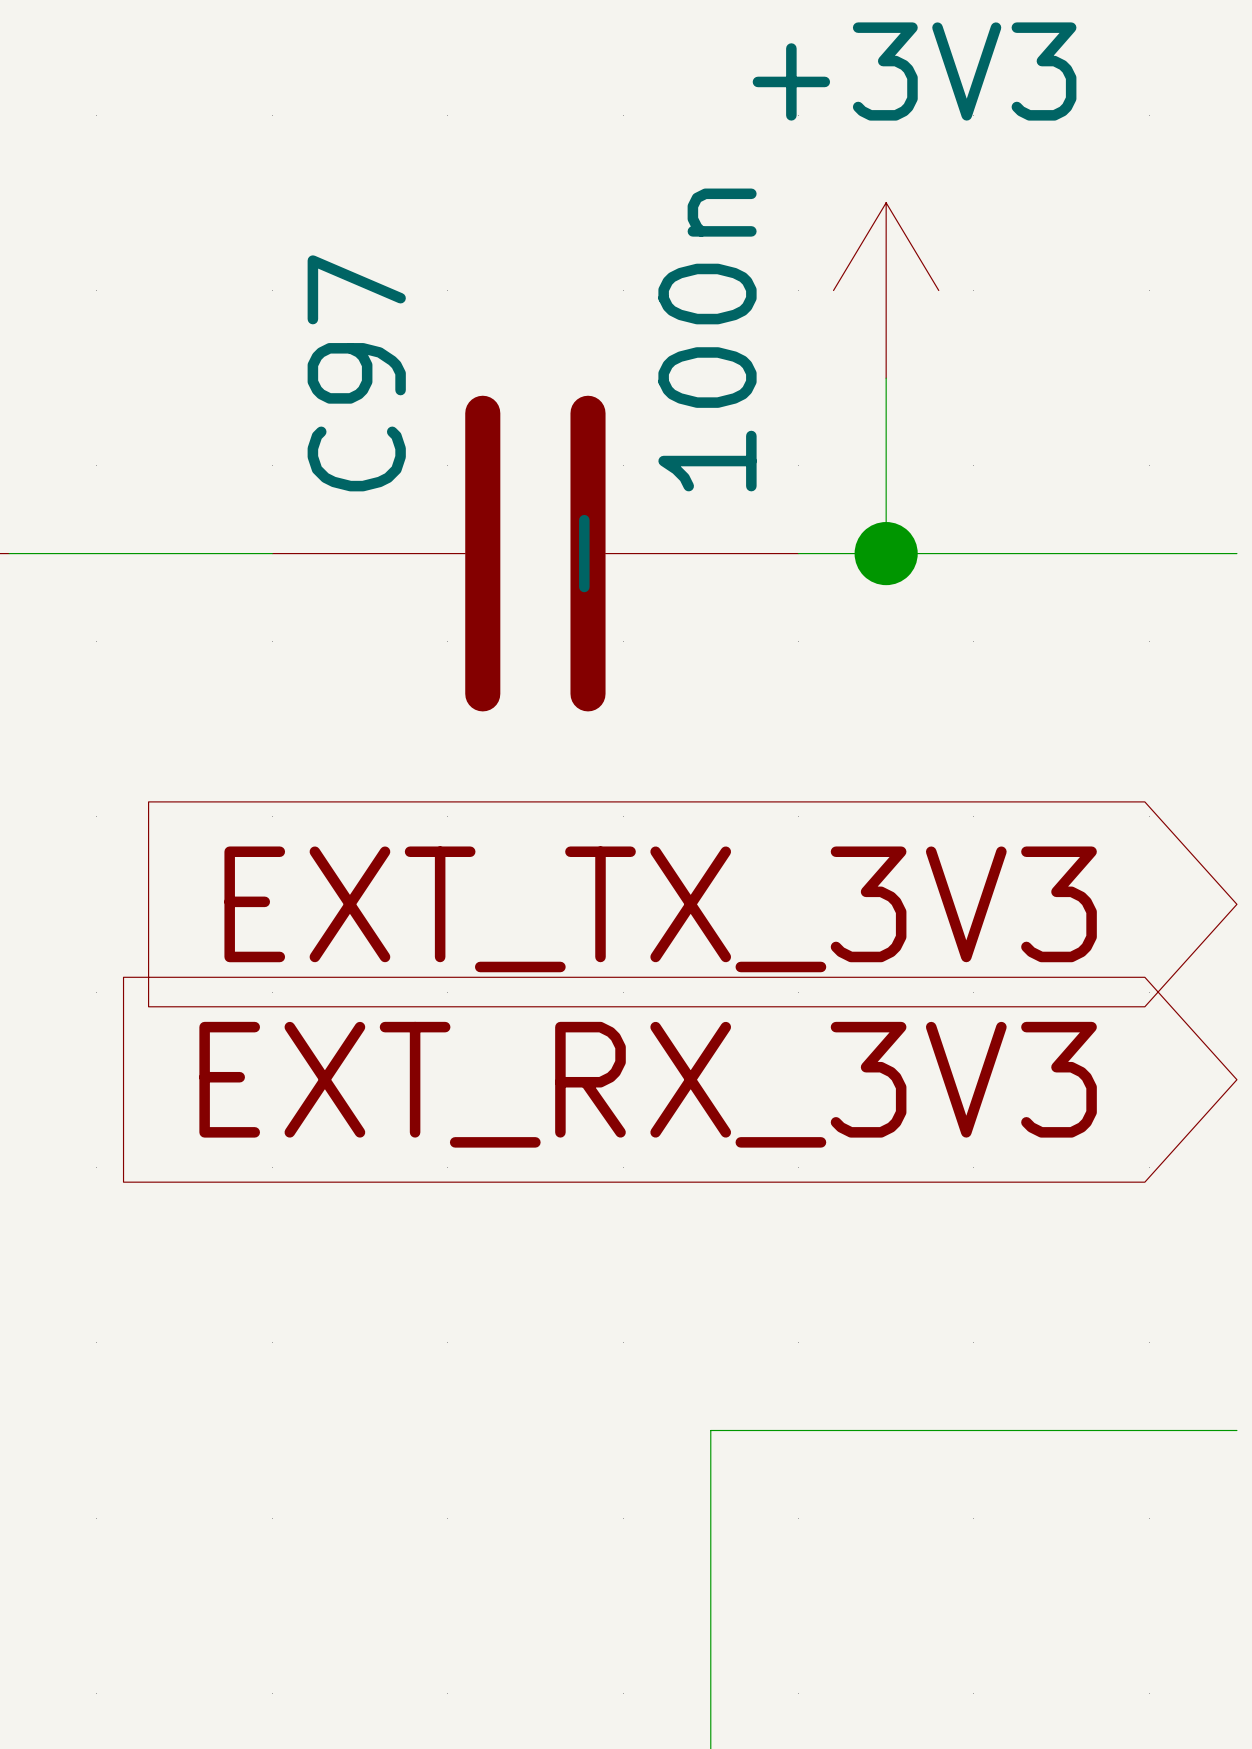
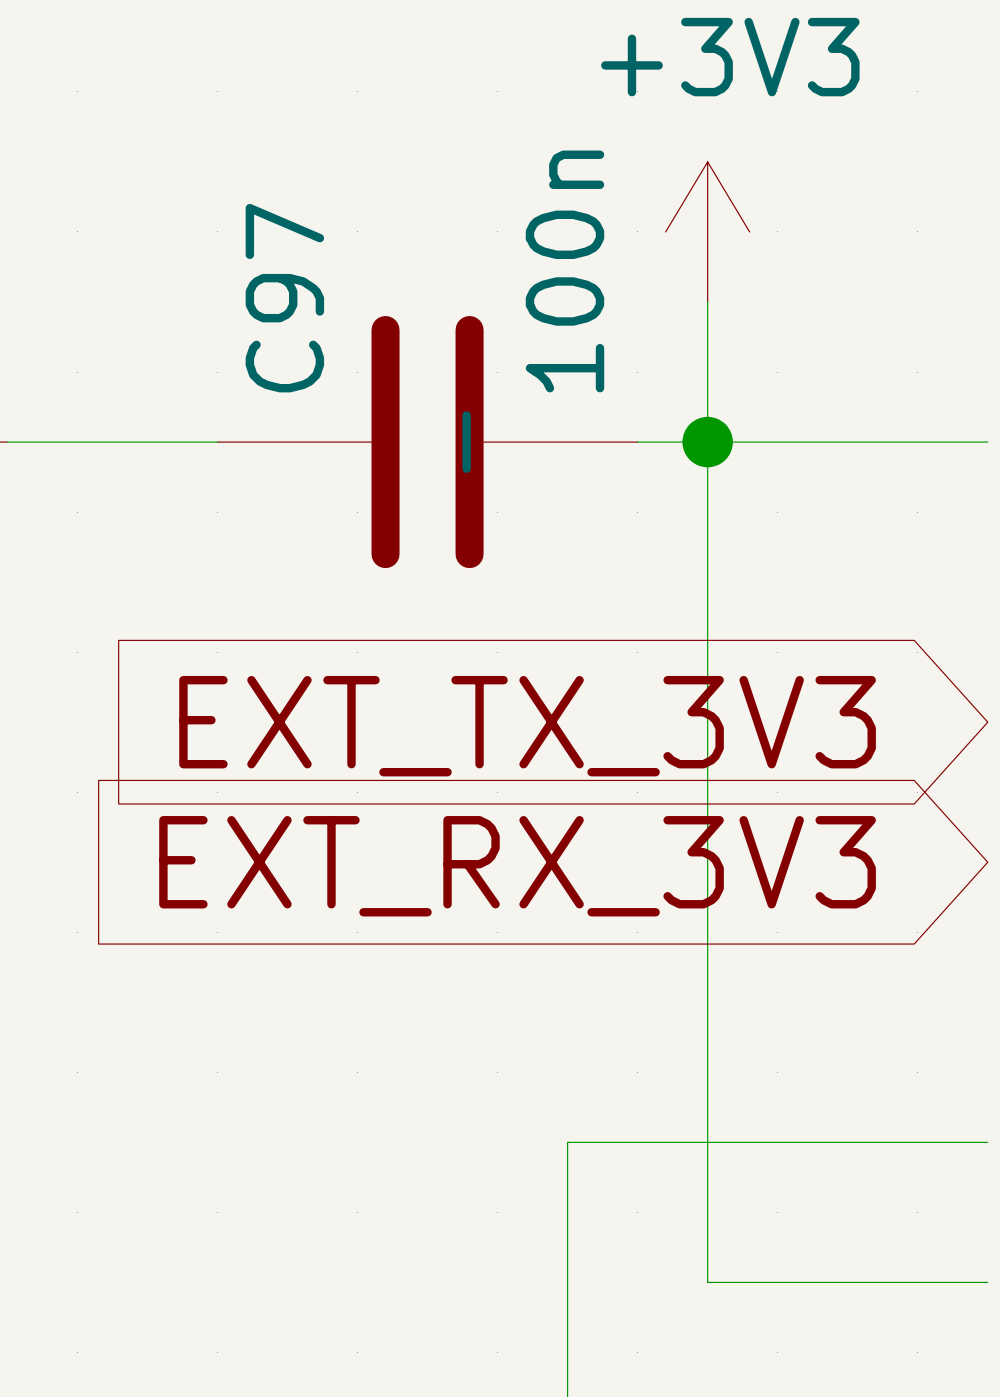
wire: none -> (707, 442) (707, 1282) (987, 1282)

